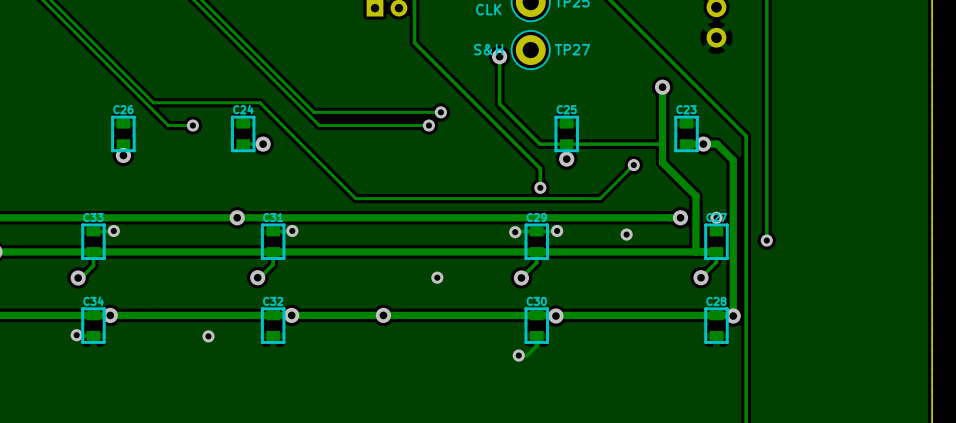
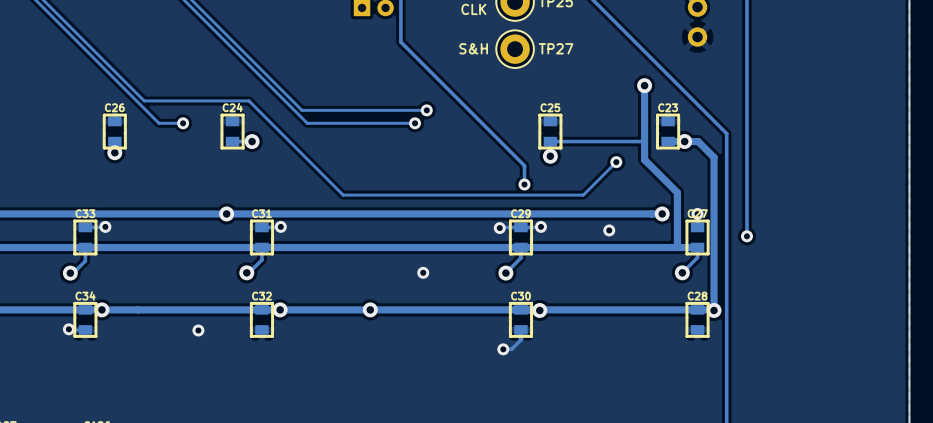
track: (499, 56) (499, 103) (539, 144) (566, 144) -> none
via: (499, 56) -> none

